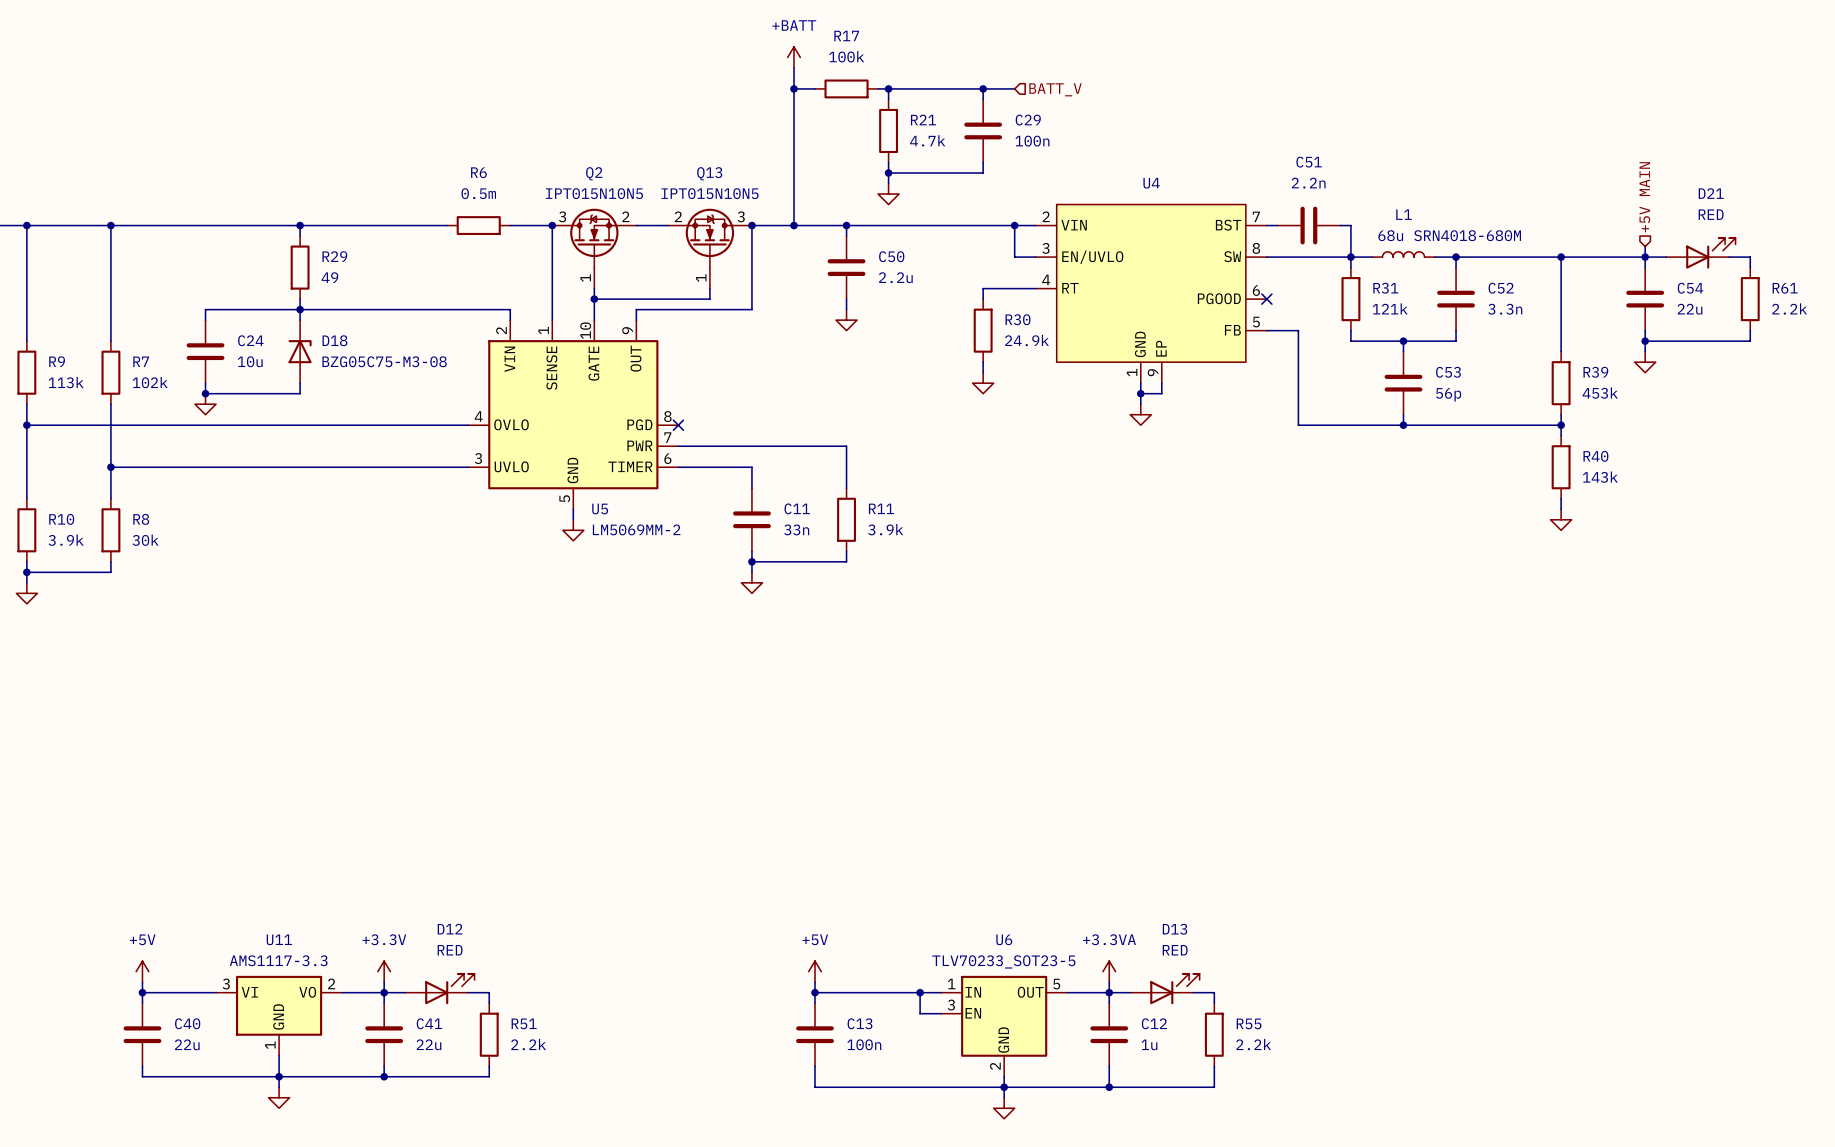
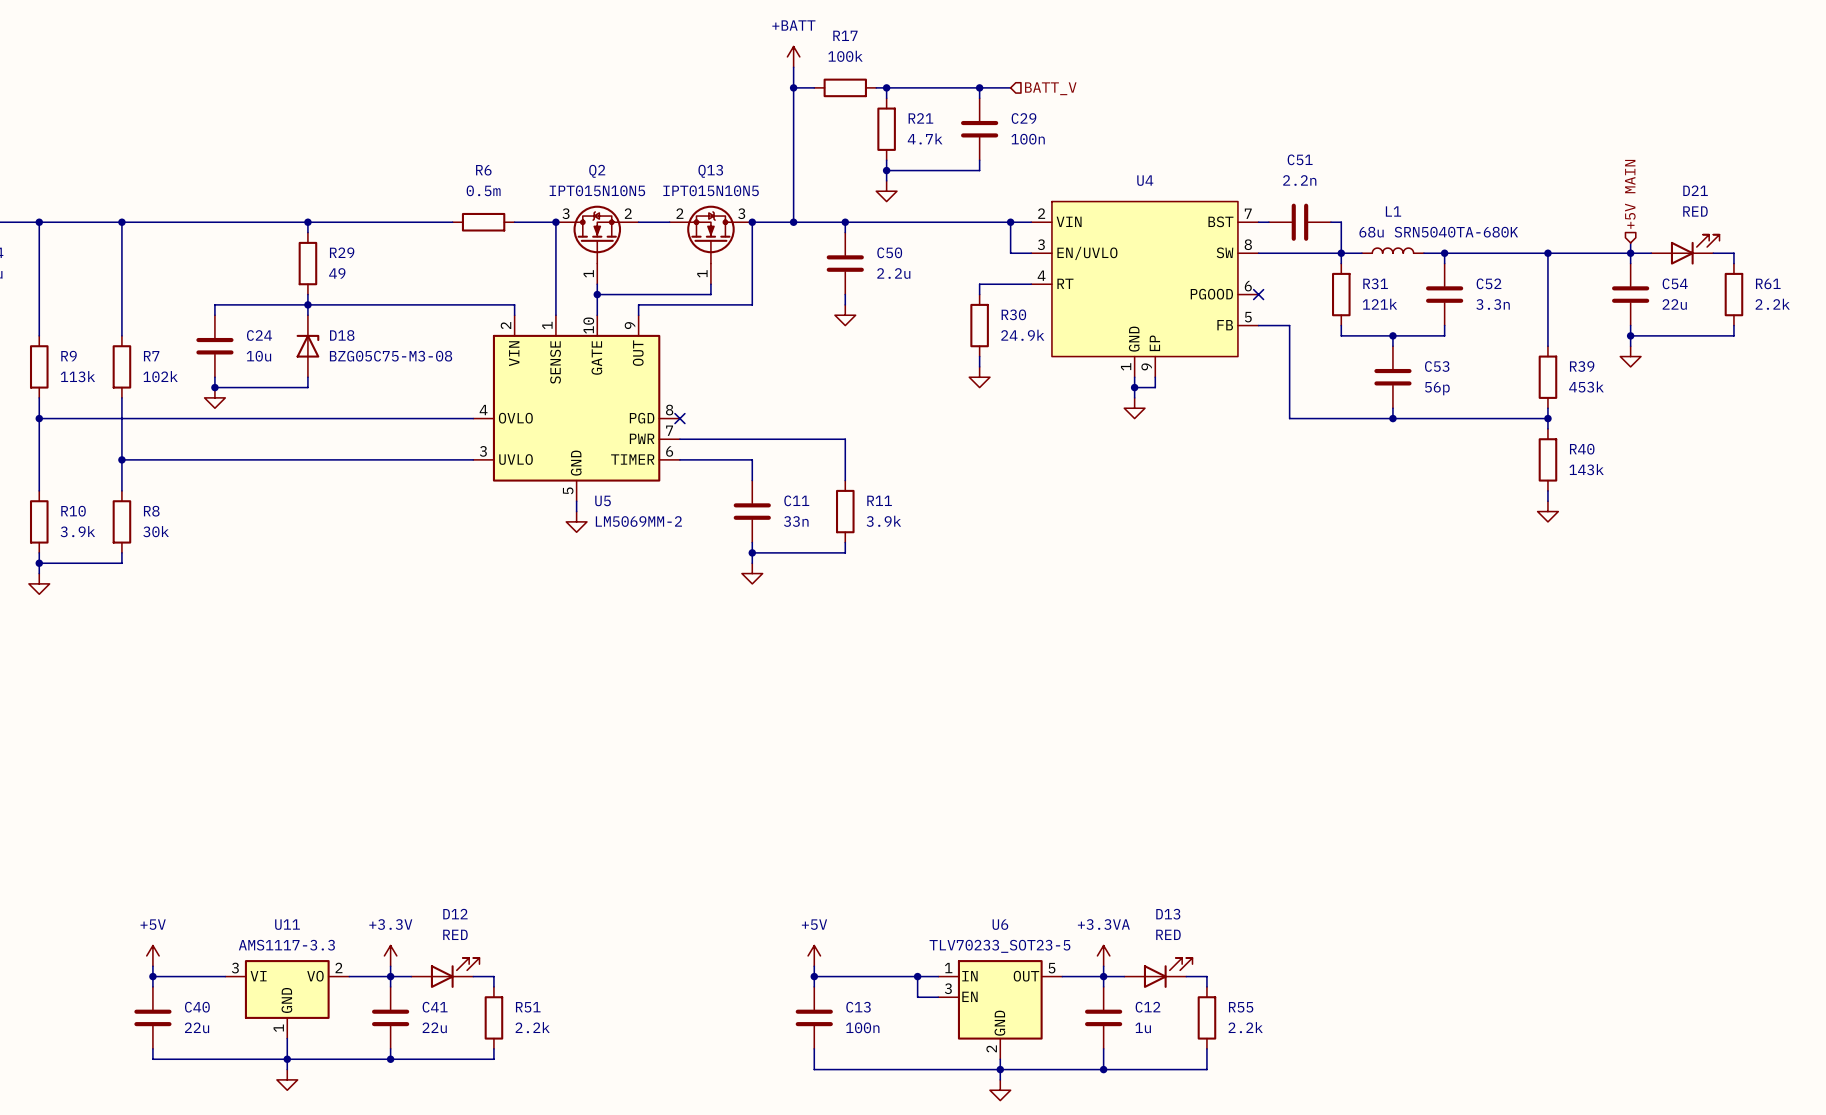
L1 value: 68u SRN4018-680M (1449, 235) -> 68u SRN5040TA-680K (1438, 232)

